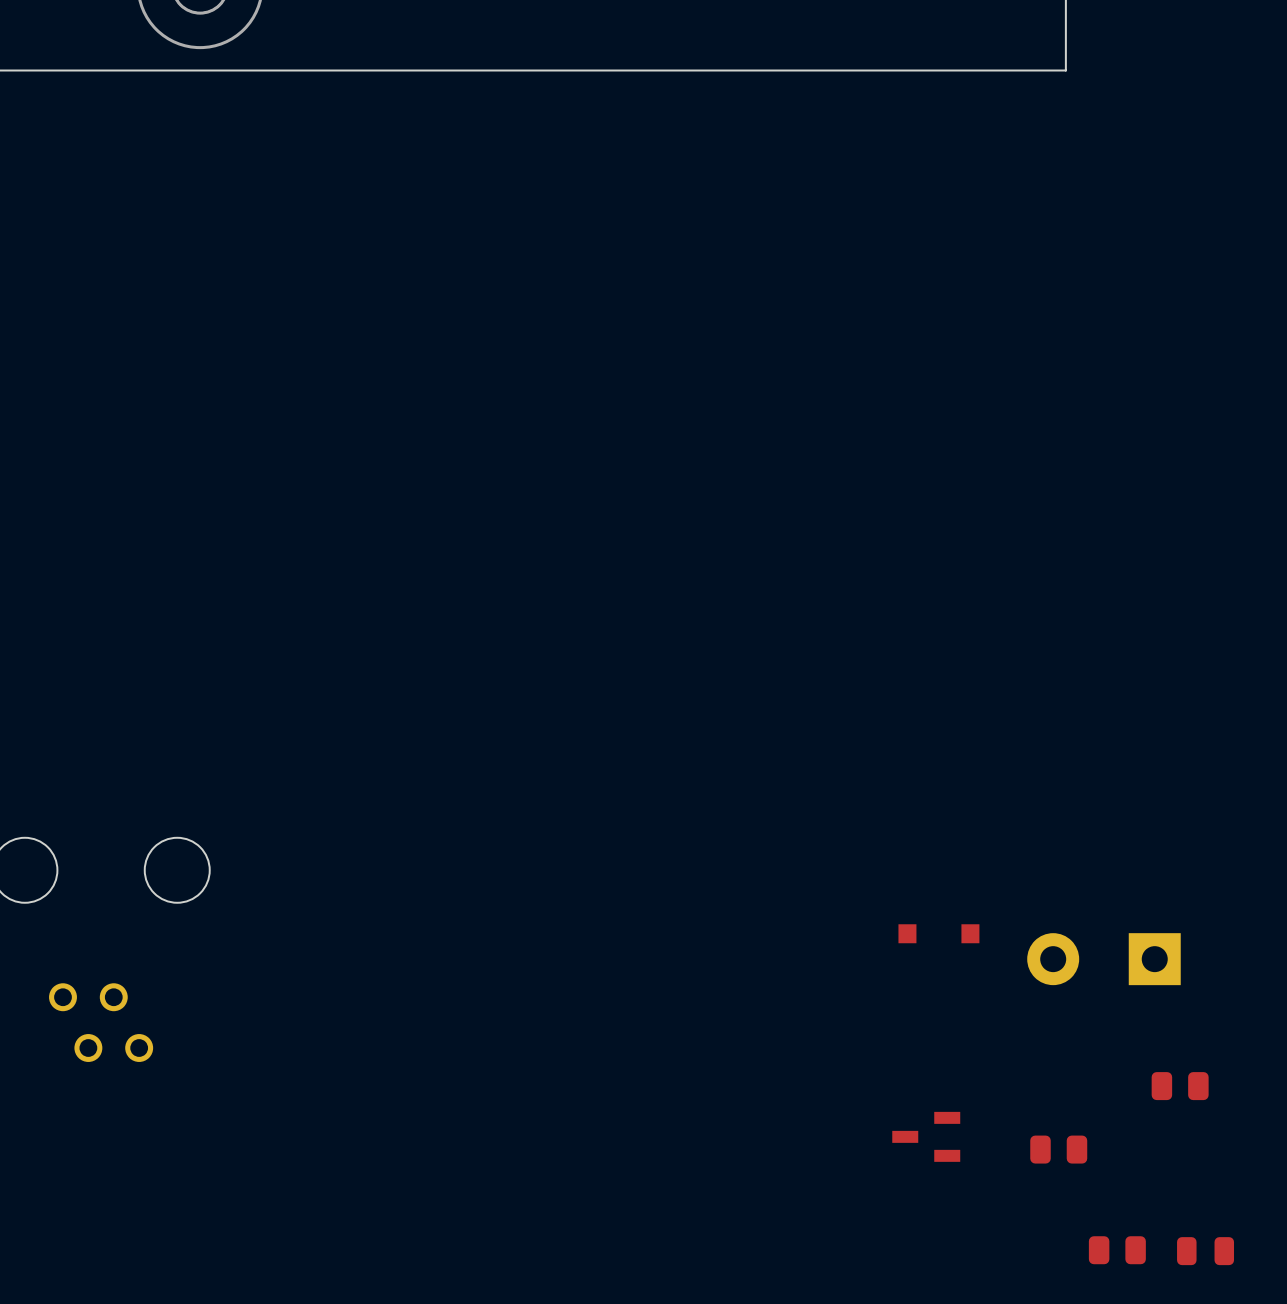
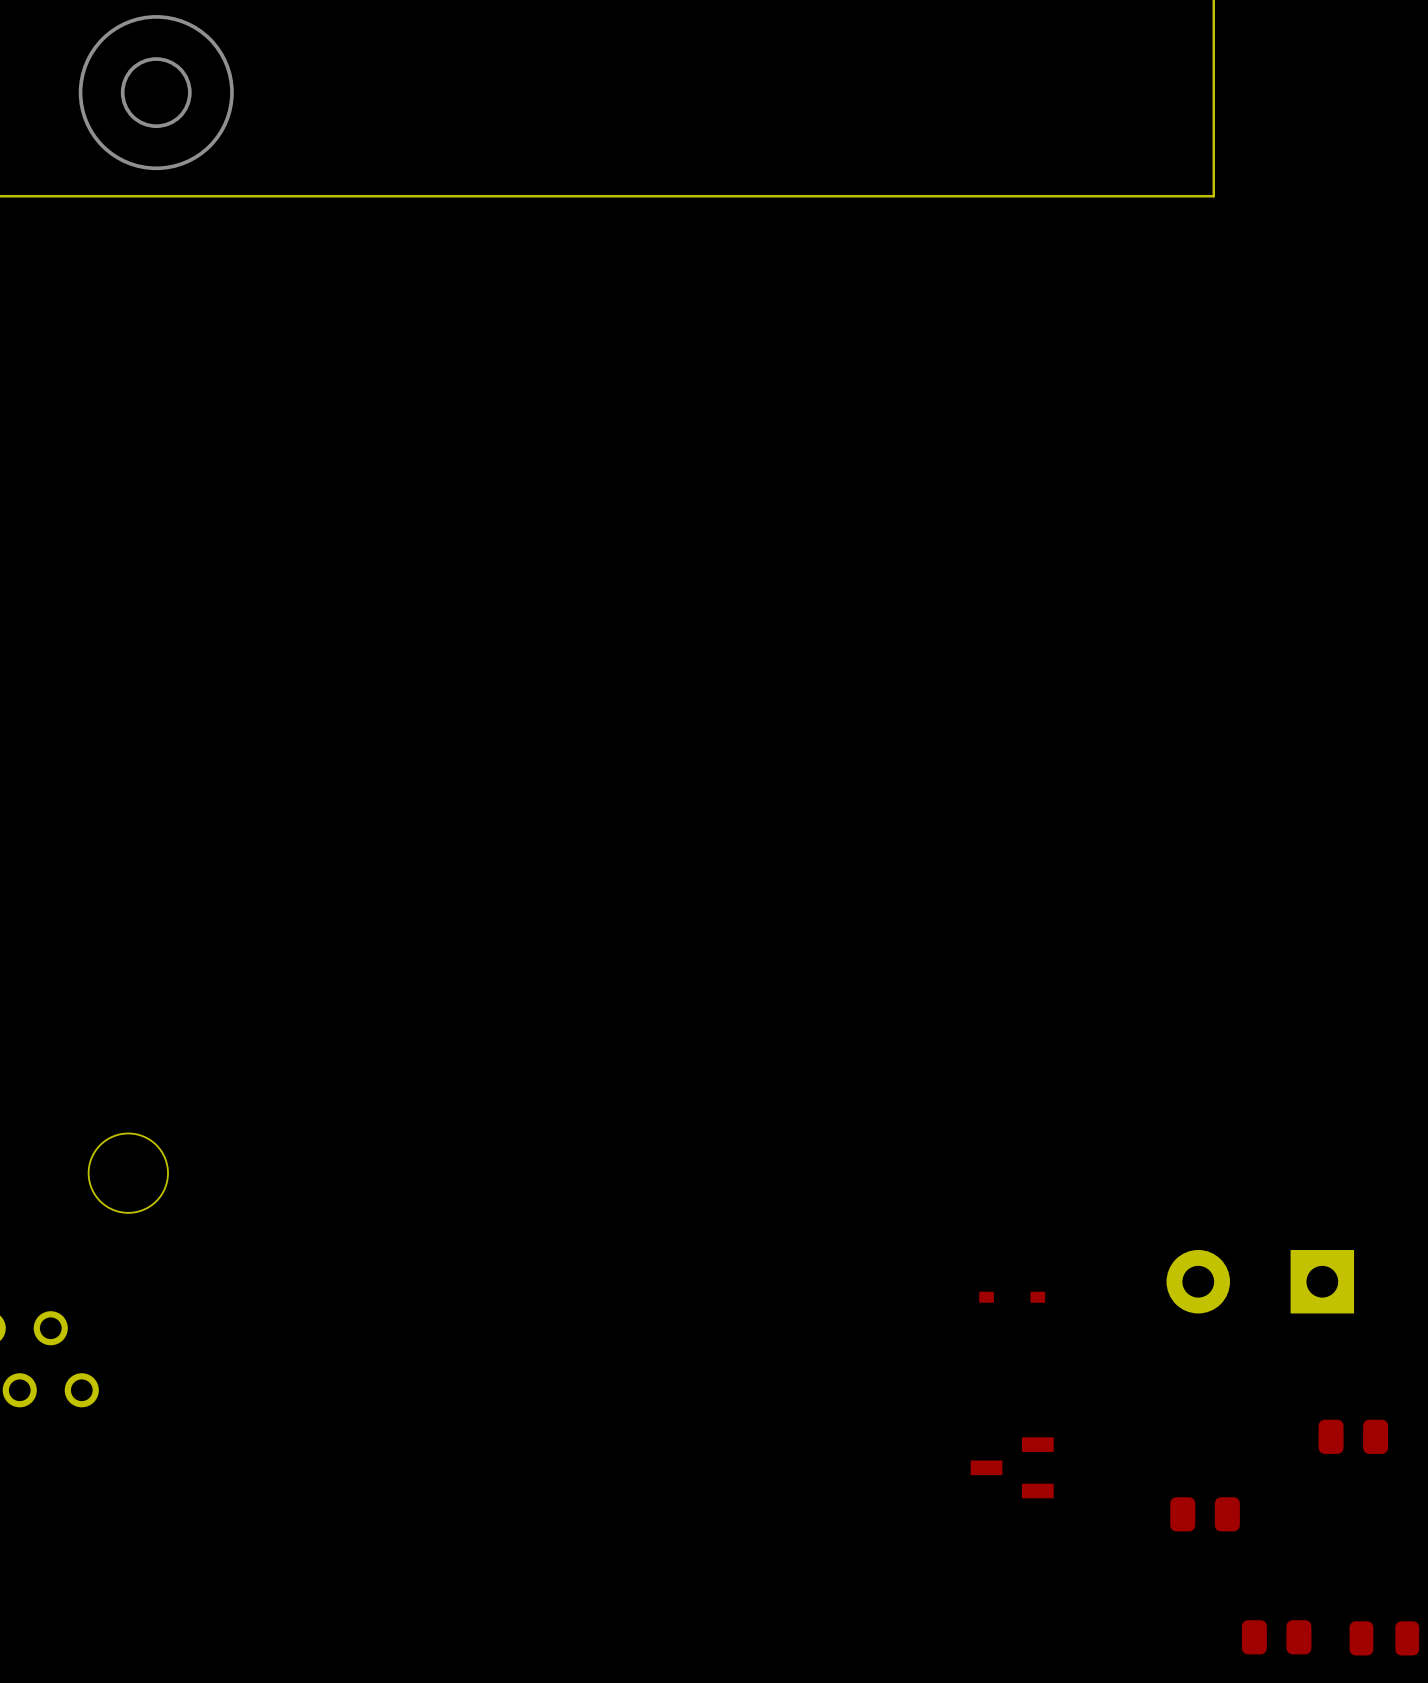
part: (938, 933) -> none
part: none -> (1012, 1297)
part position: (926, 1136) -> (1012, 1467)

